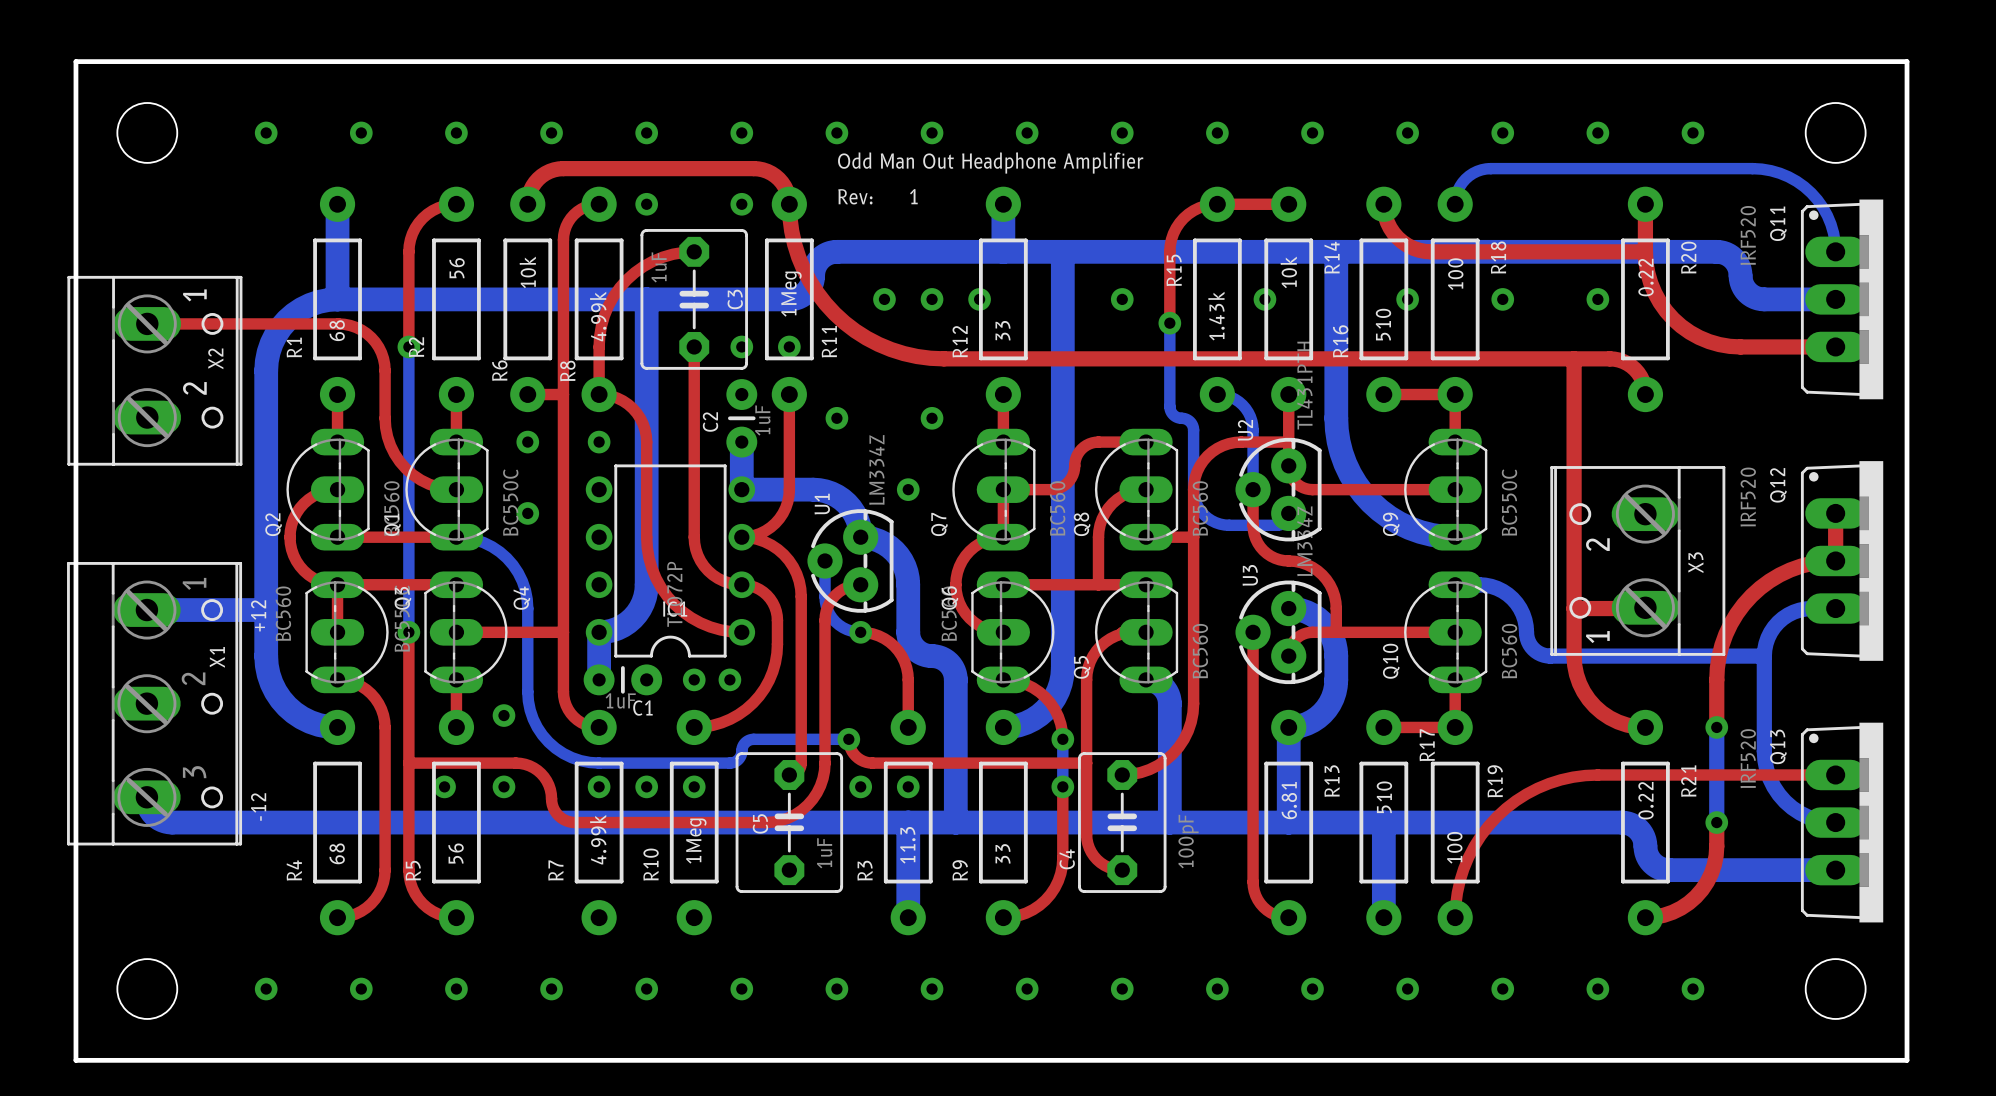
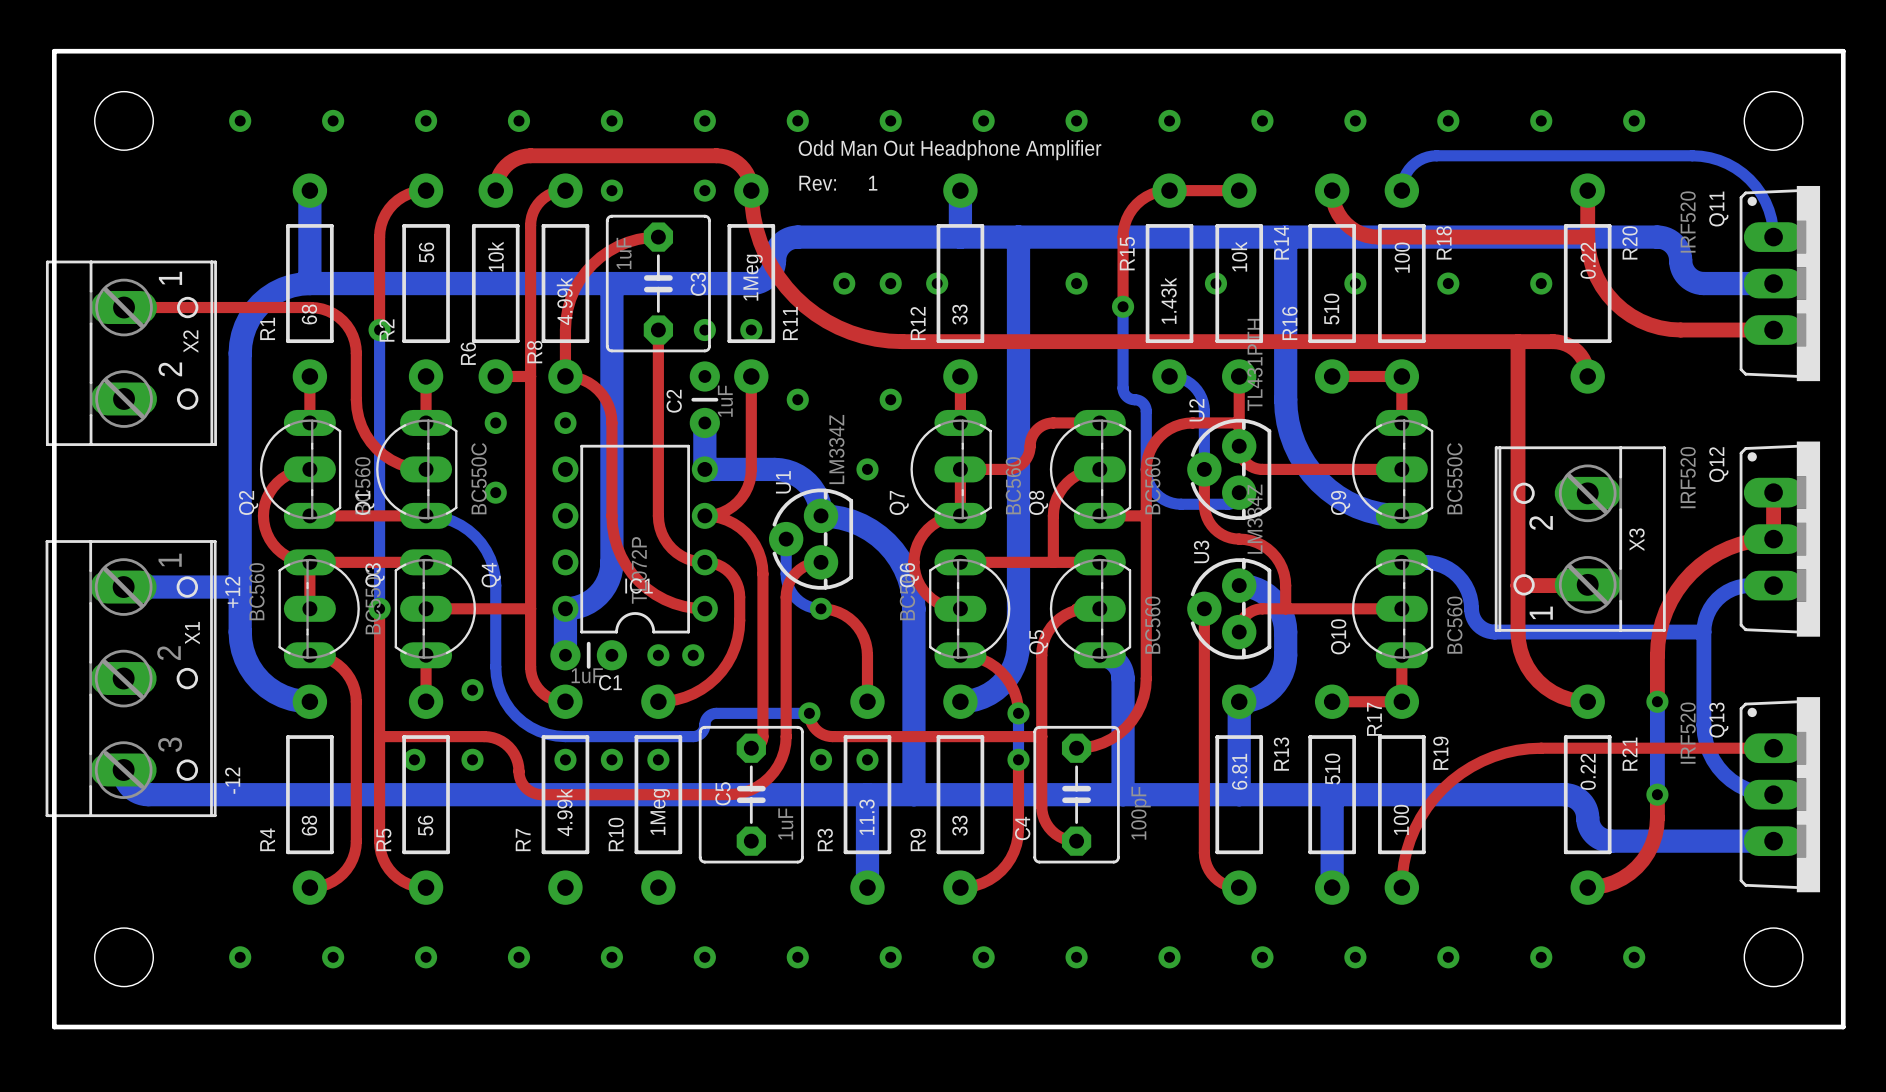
bottom track: (860, 537) (873, 538) (884, 543) (894, 551) (901, 560) (907, 578) (910, 641) (920, 652) (946, 661) (952, 667) (955, 679) -> (821, 515) (841, 518) (861, 525) (878, 536) (899, 559) (908, 578) (913, 598) (913, 655)

